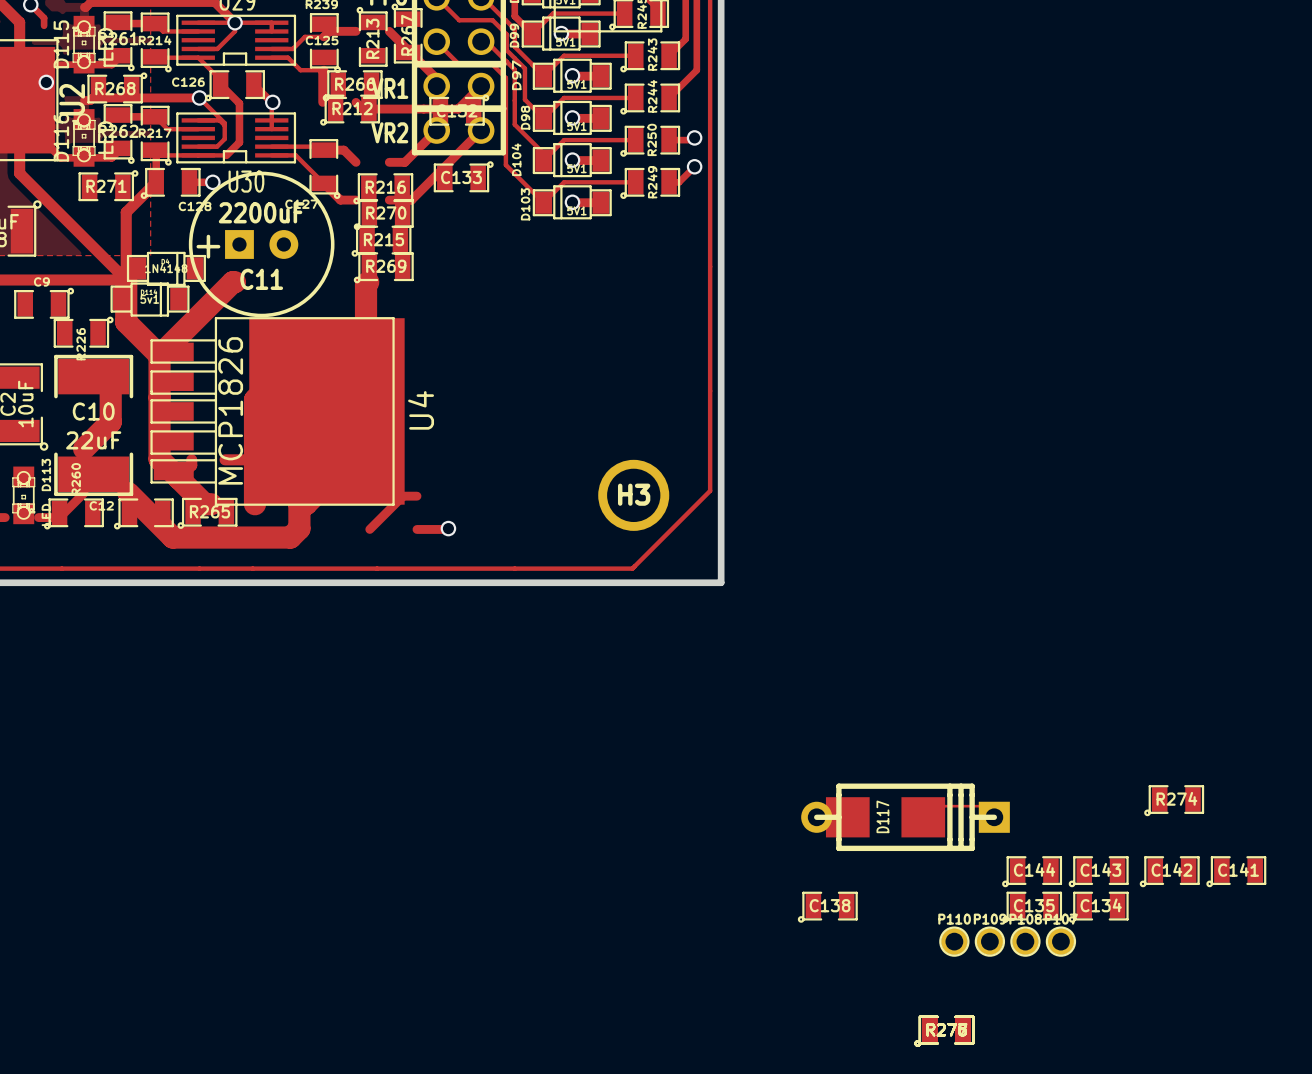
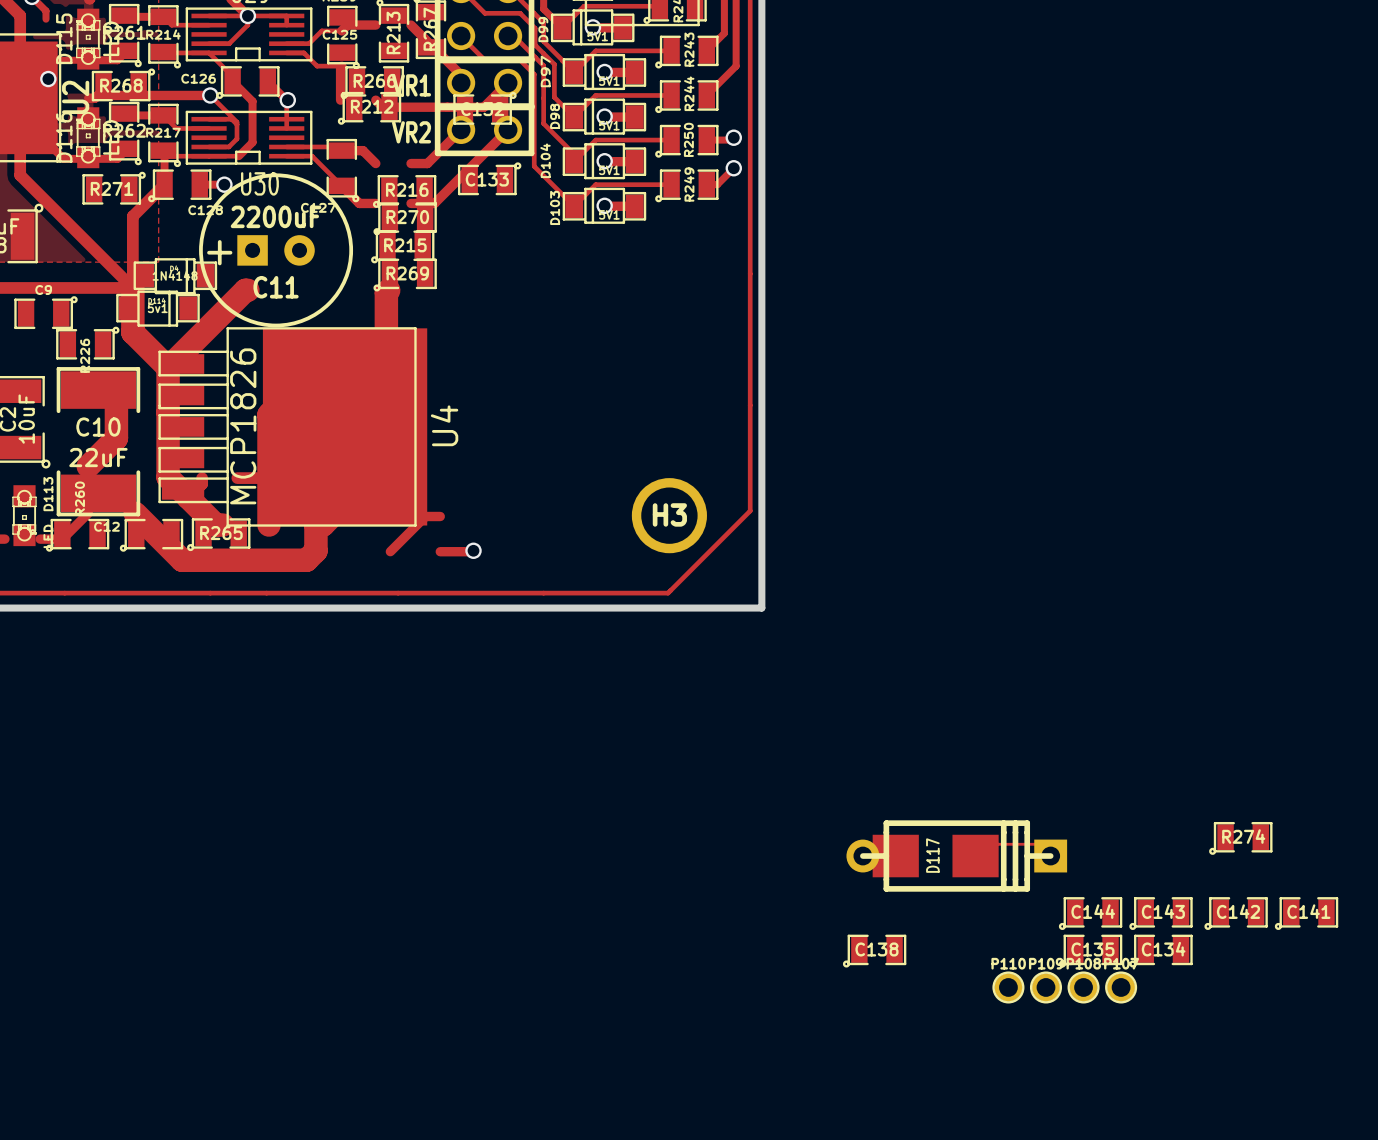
part: (944, 1031) -> none
part: (944, 1031) -> none
part: (944, 1031) -> none
part: (944, 1031) -> none

